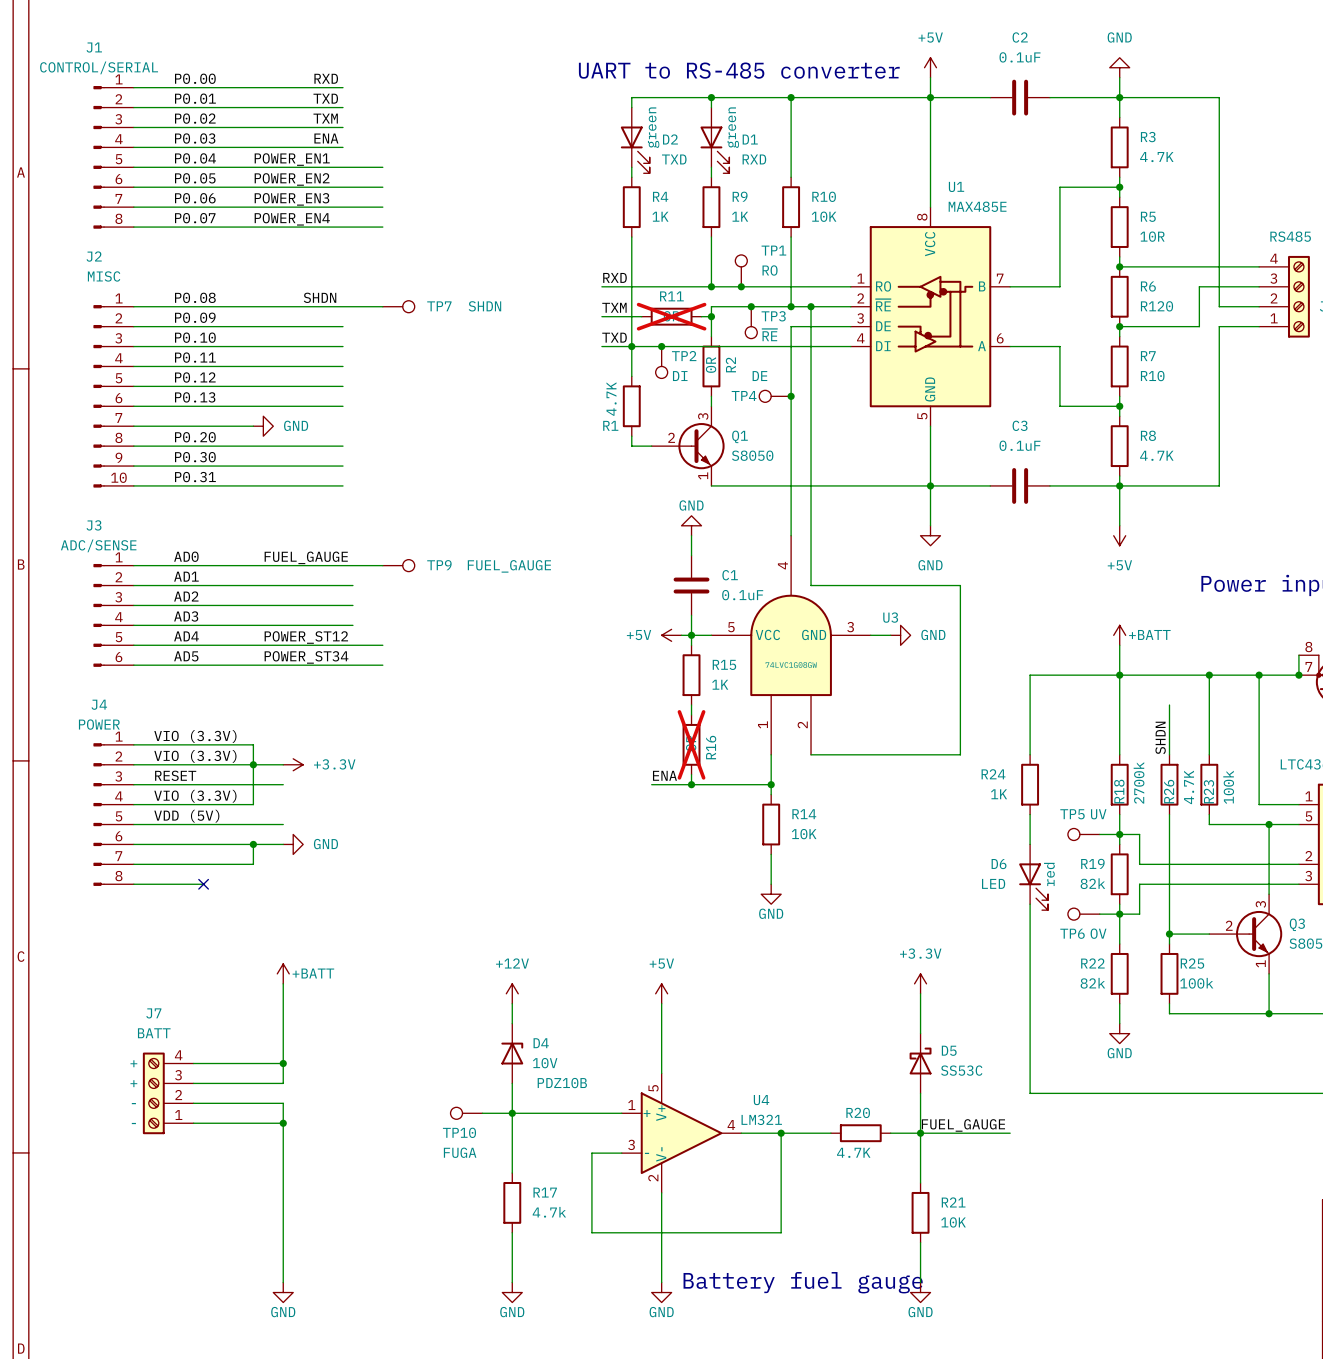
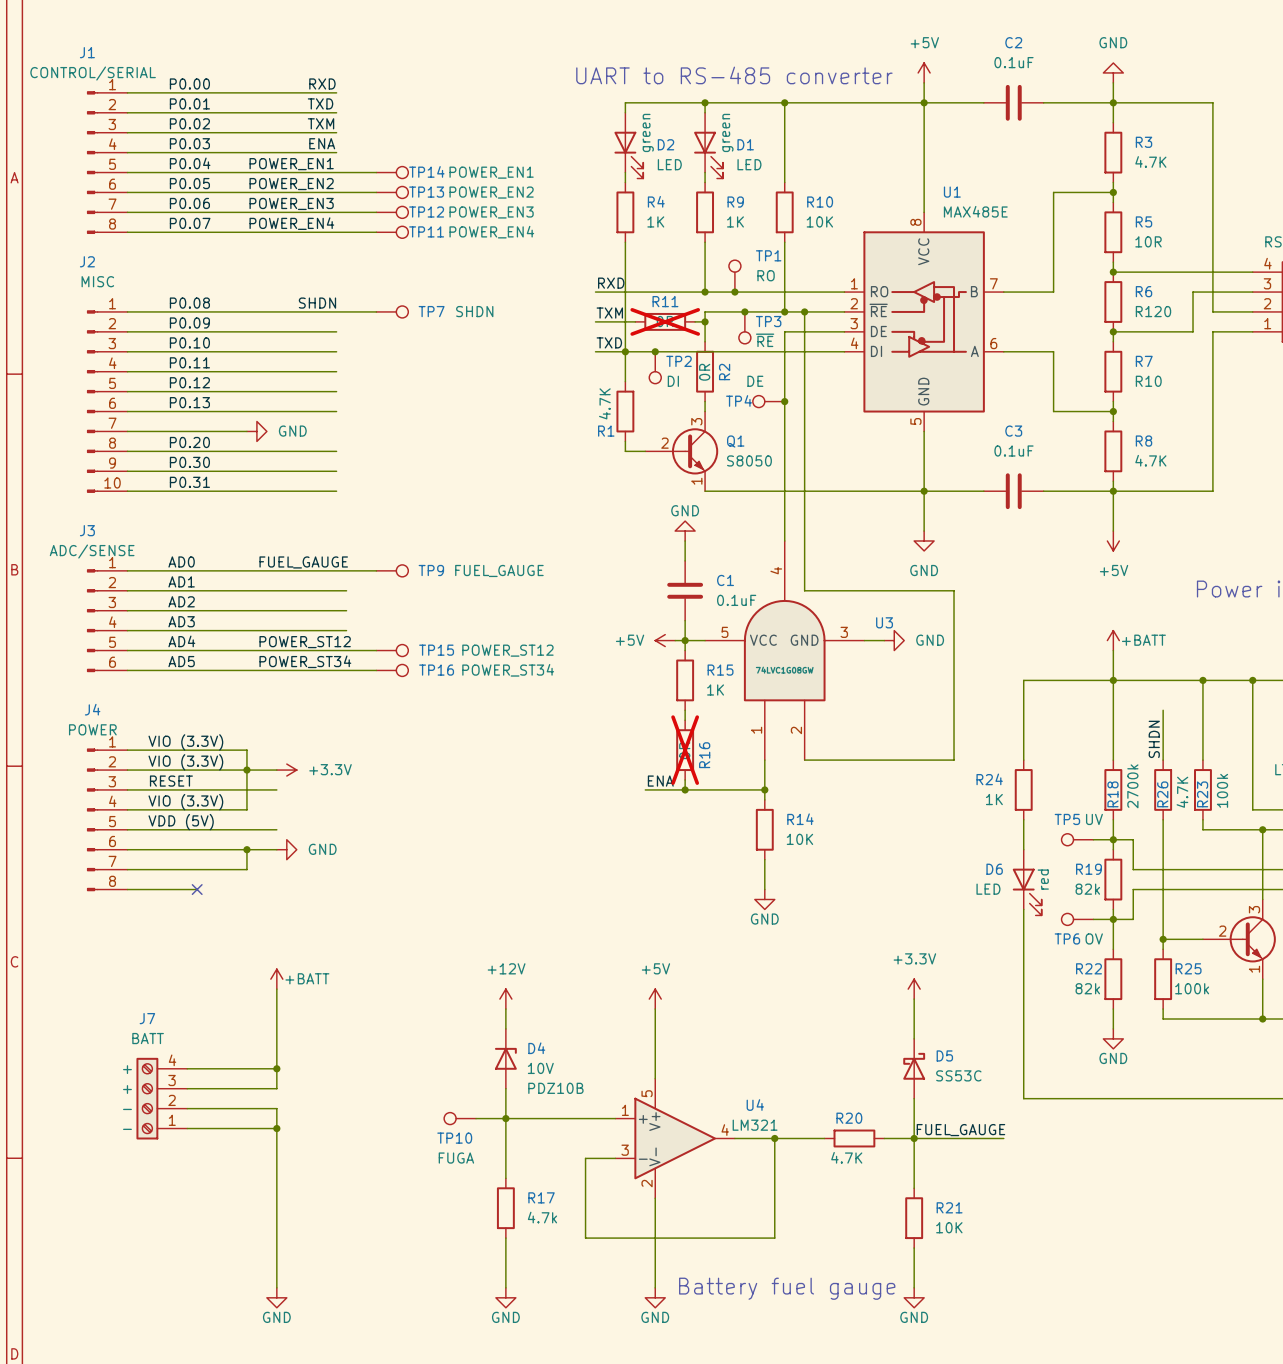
D2 value: TXD (674, 159) -> LED (669, 164)
D1 value: RXD (754, 159) -> LED (749, 164)
TP14: none -> POWER_EN1 (392, 172)
TP13: none -> POWER_EN2 (392, 192)
TP12: none -> POWER_EN3 (392, 212)
TP11: none -> POWER_EN4 (392, 232)
TP15: none -> POWER_ST12 (392, 650)
TP16: none -> POWER_ST34 (392, 670)

